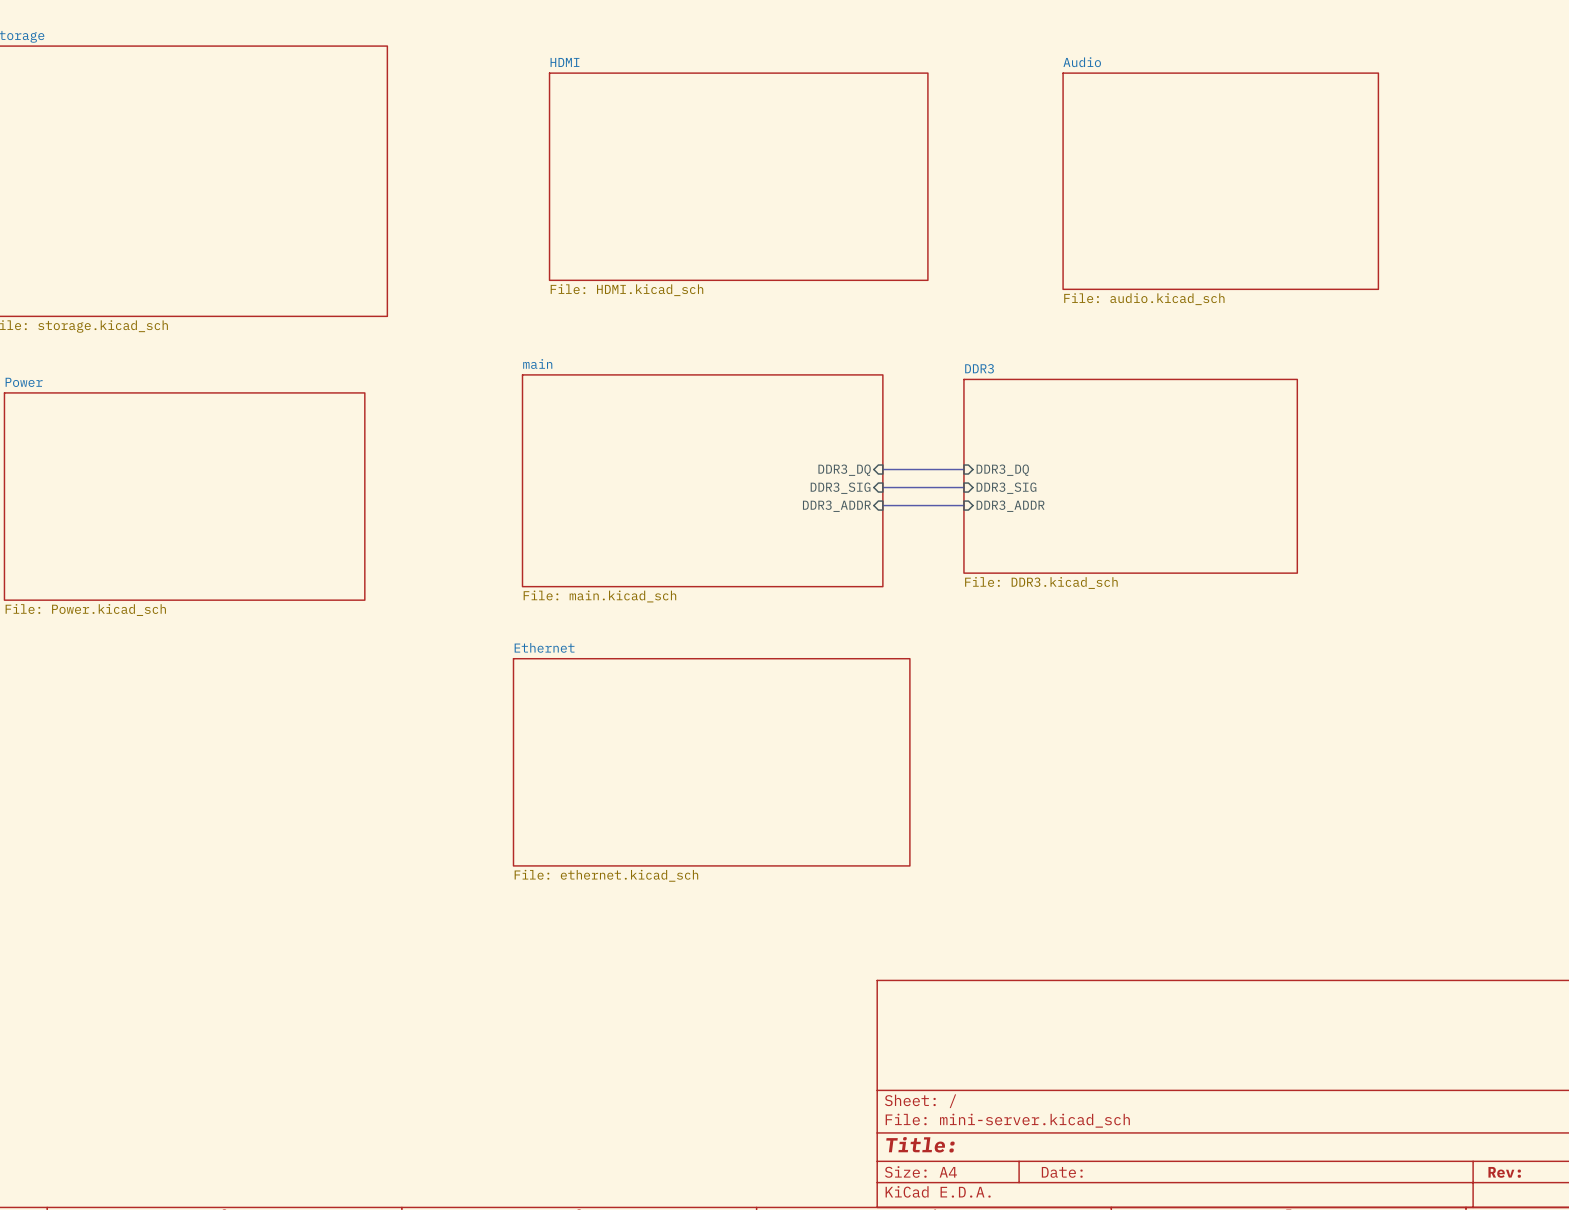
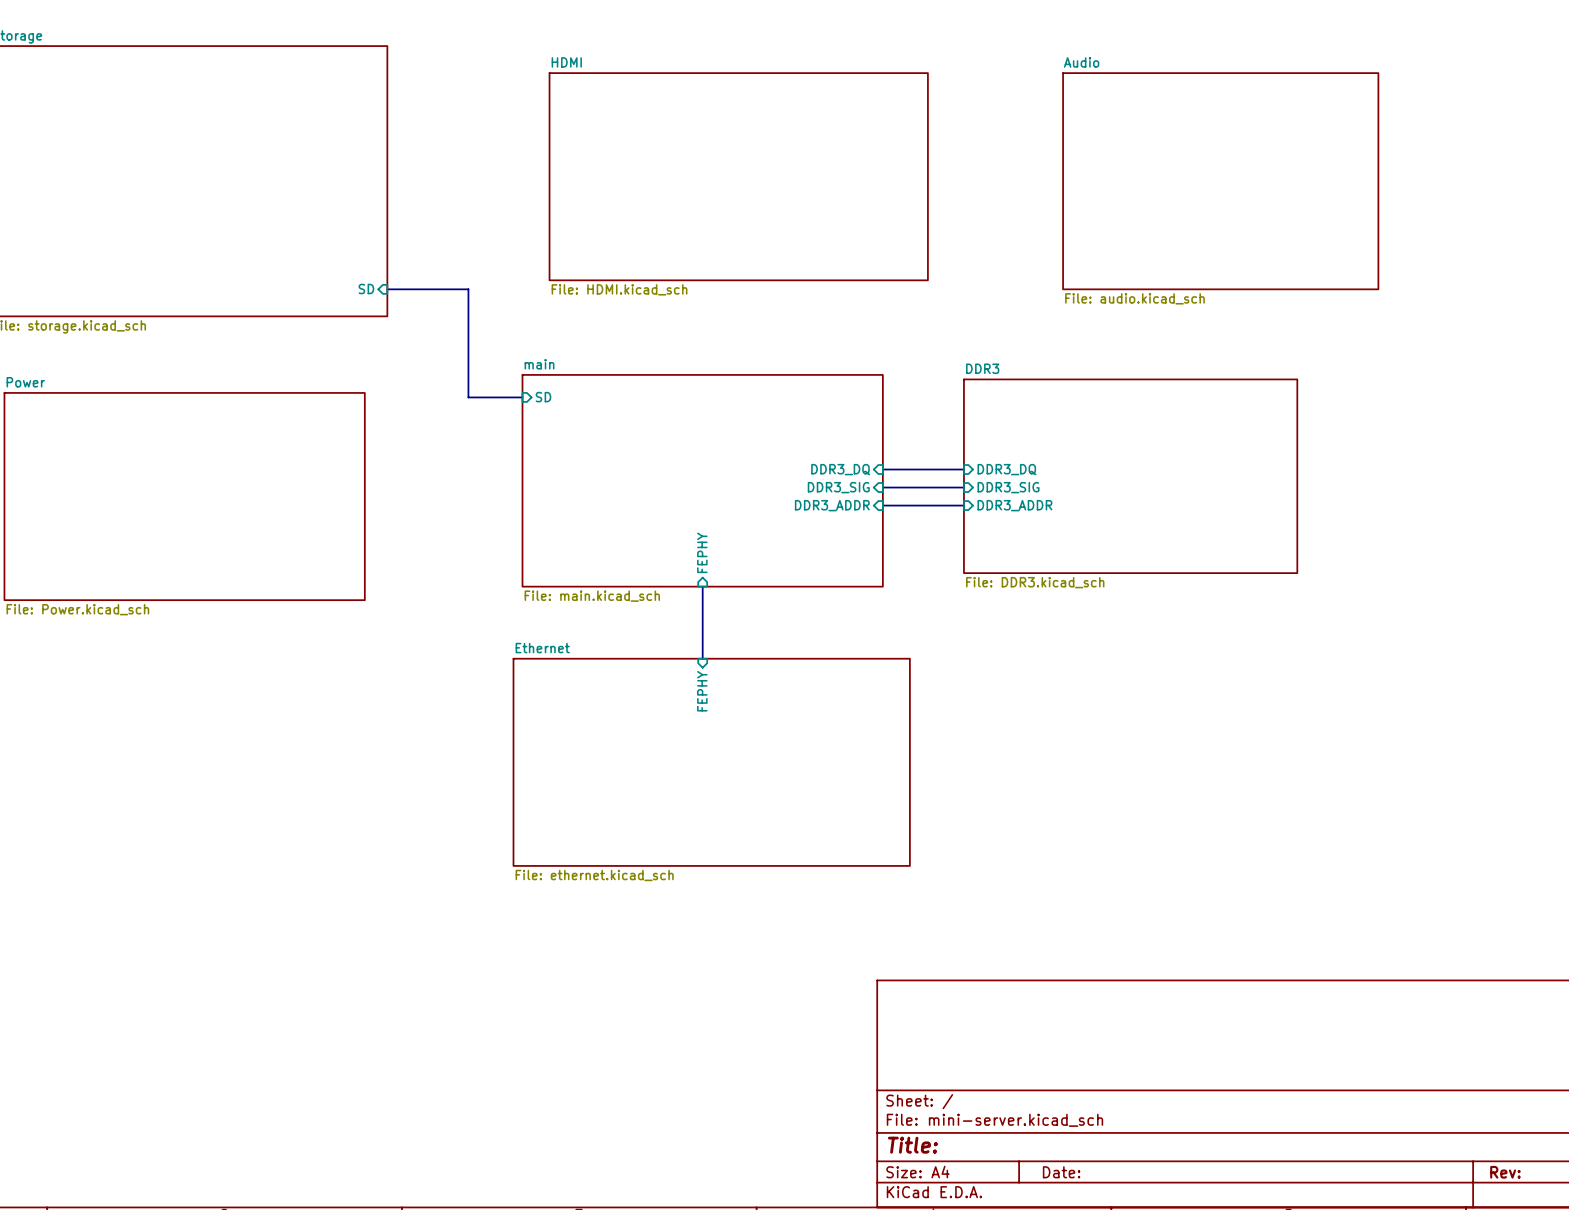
sheet pin: none -> SD (366, 288)
bus: none -> (387, 289) (468, 289) (468, 397) (522, 397)
sheet pin: none -> SD (543, 397)
sheet pin: none -> FEPHY (702, 552)
bus: none -> (702, 586) (702, 658)
sheet pin: none -> FEPHY (702, 691)

